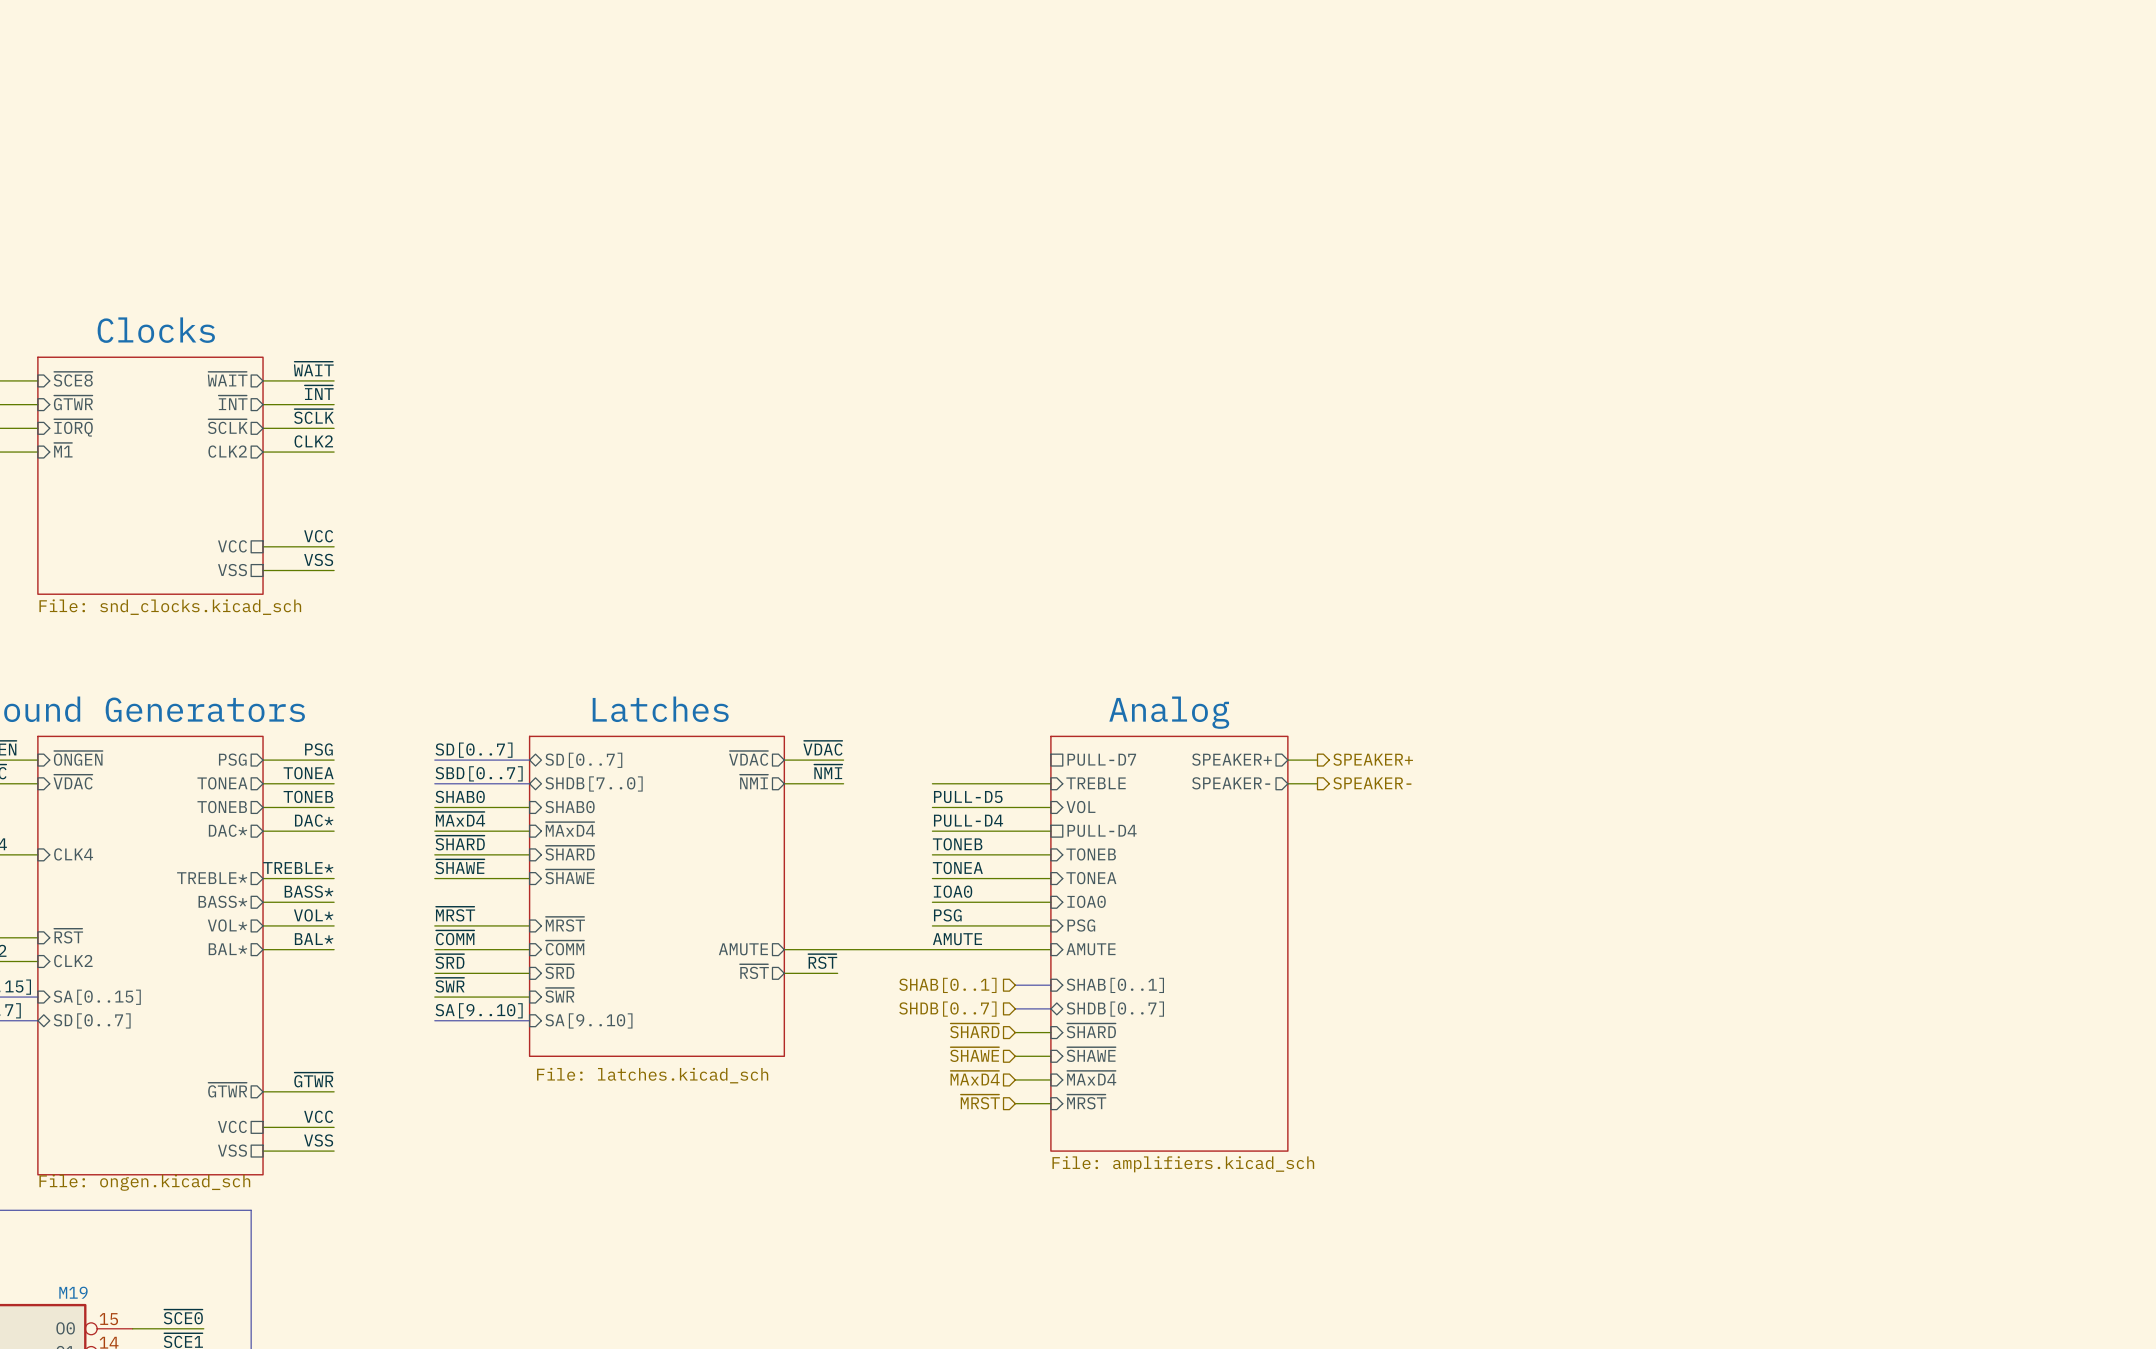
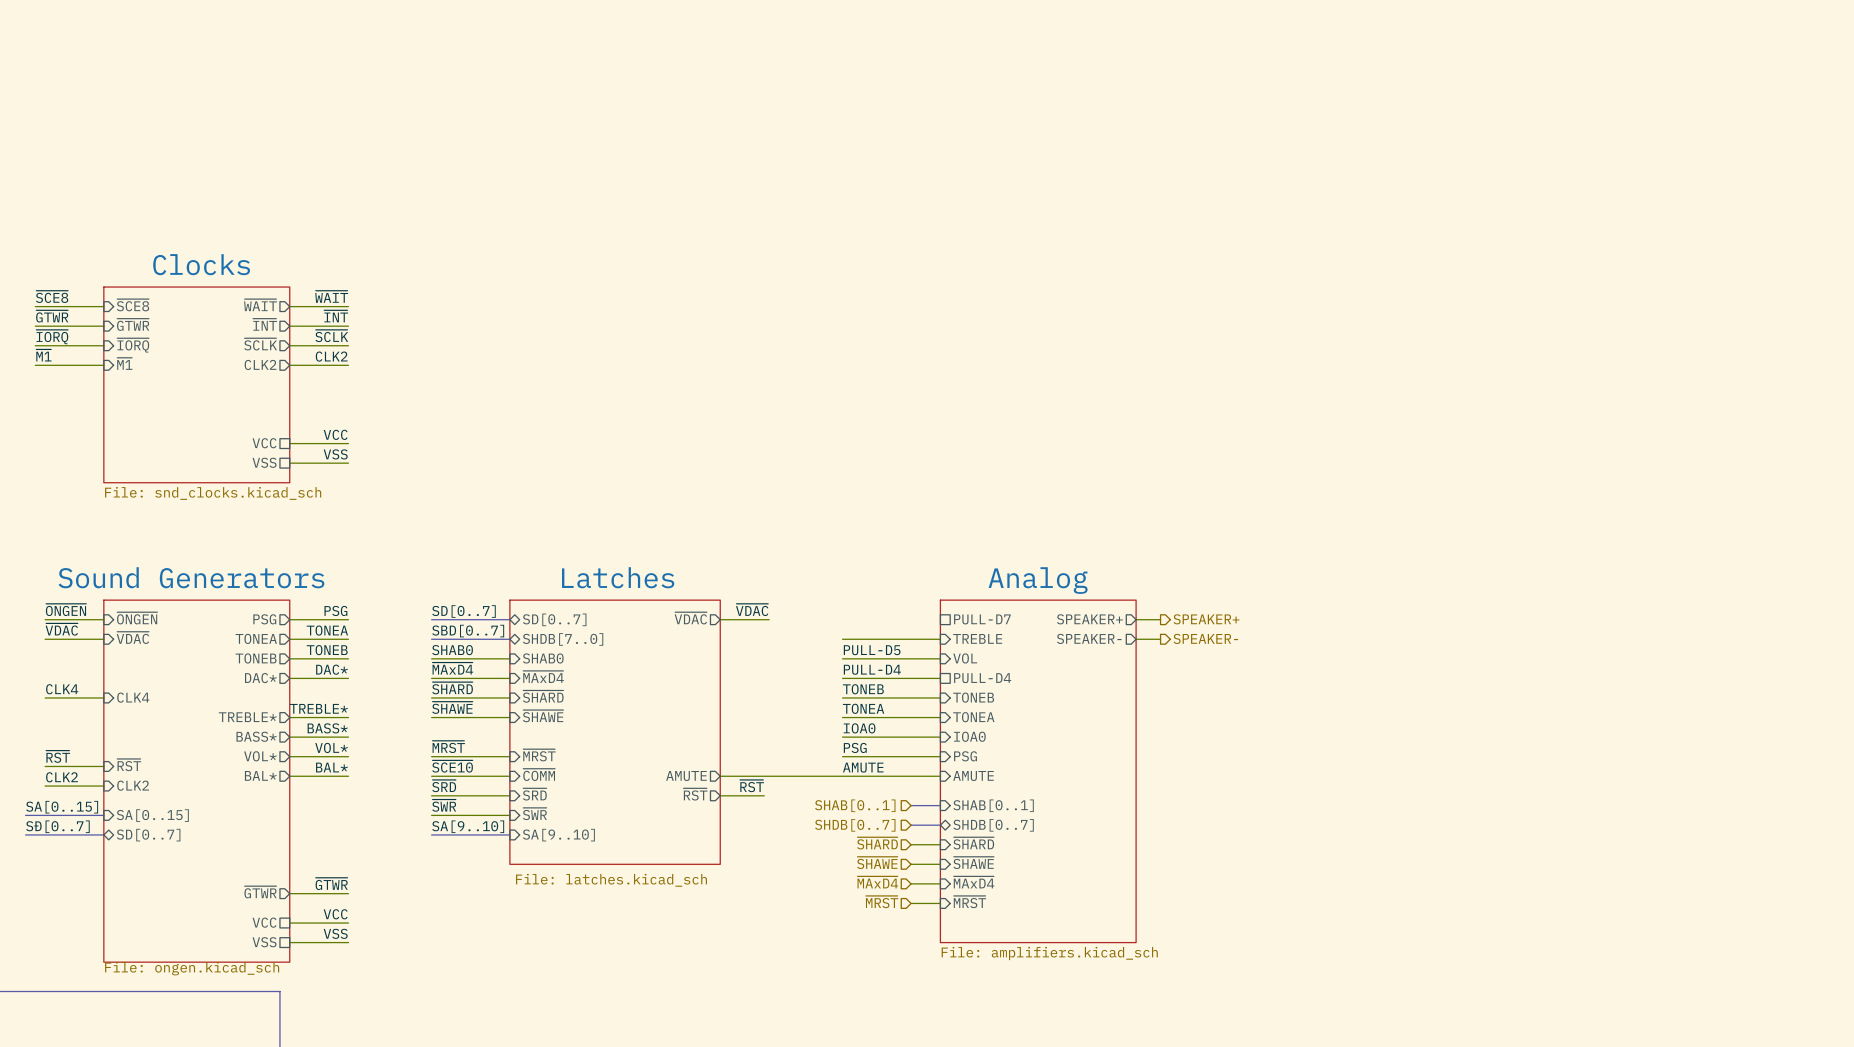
label: ~{NMI} (828, 771) -> none
sheet pin: ~{NMI} (754, 781) -> none
wire: (784, 783) (843, 783) -> none
label: ~{COMM} (455, 937) -> ~{SCE10} (452, 766)

